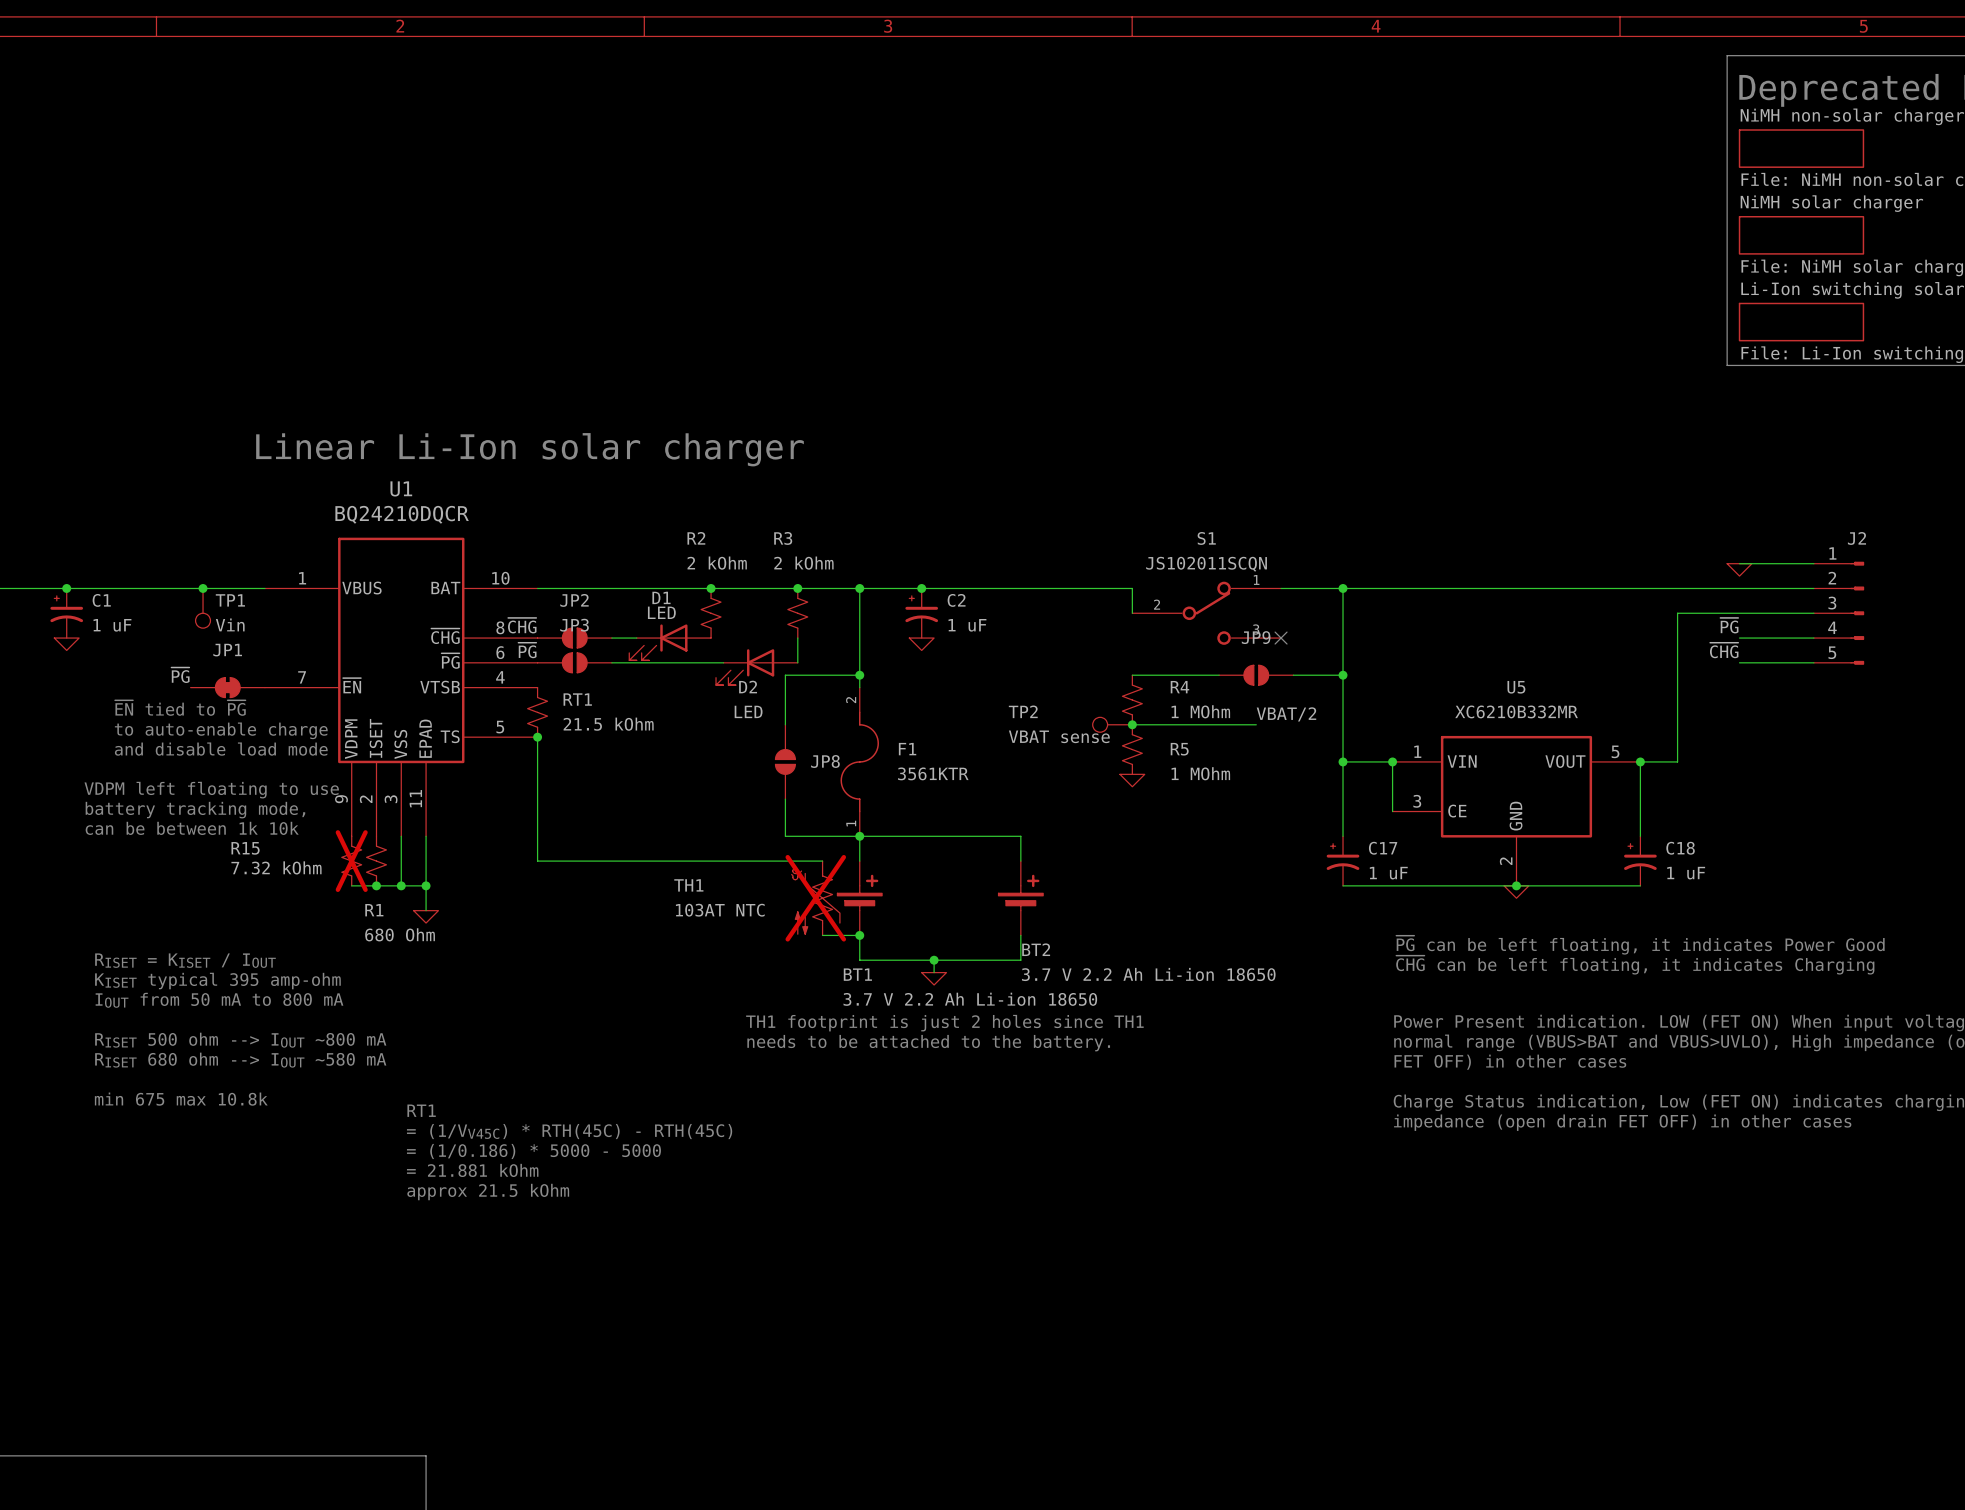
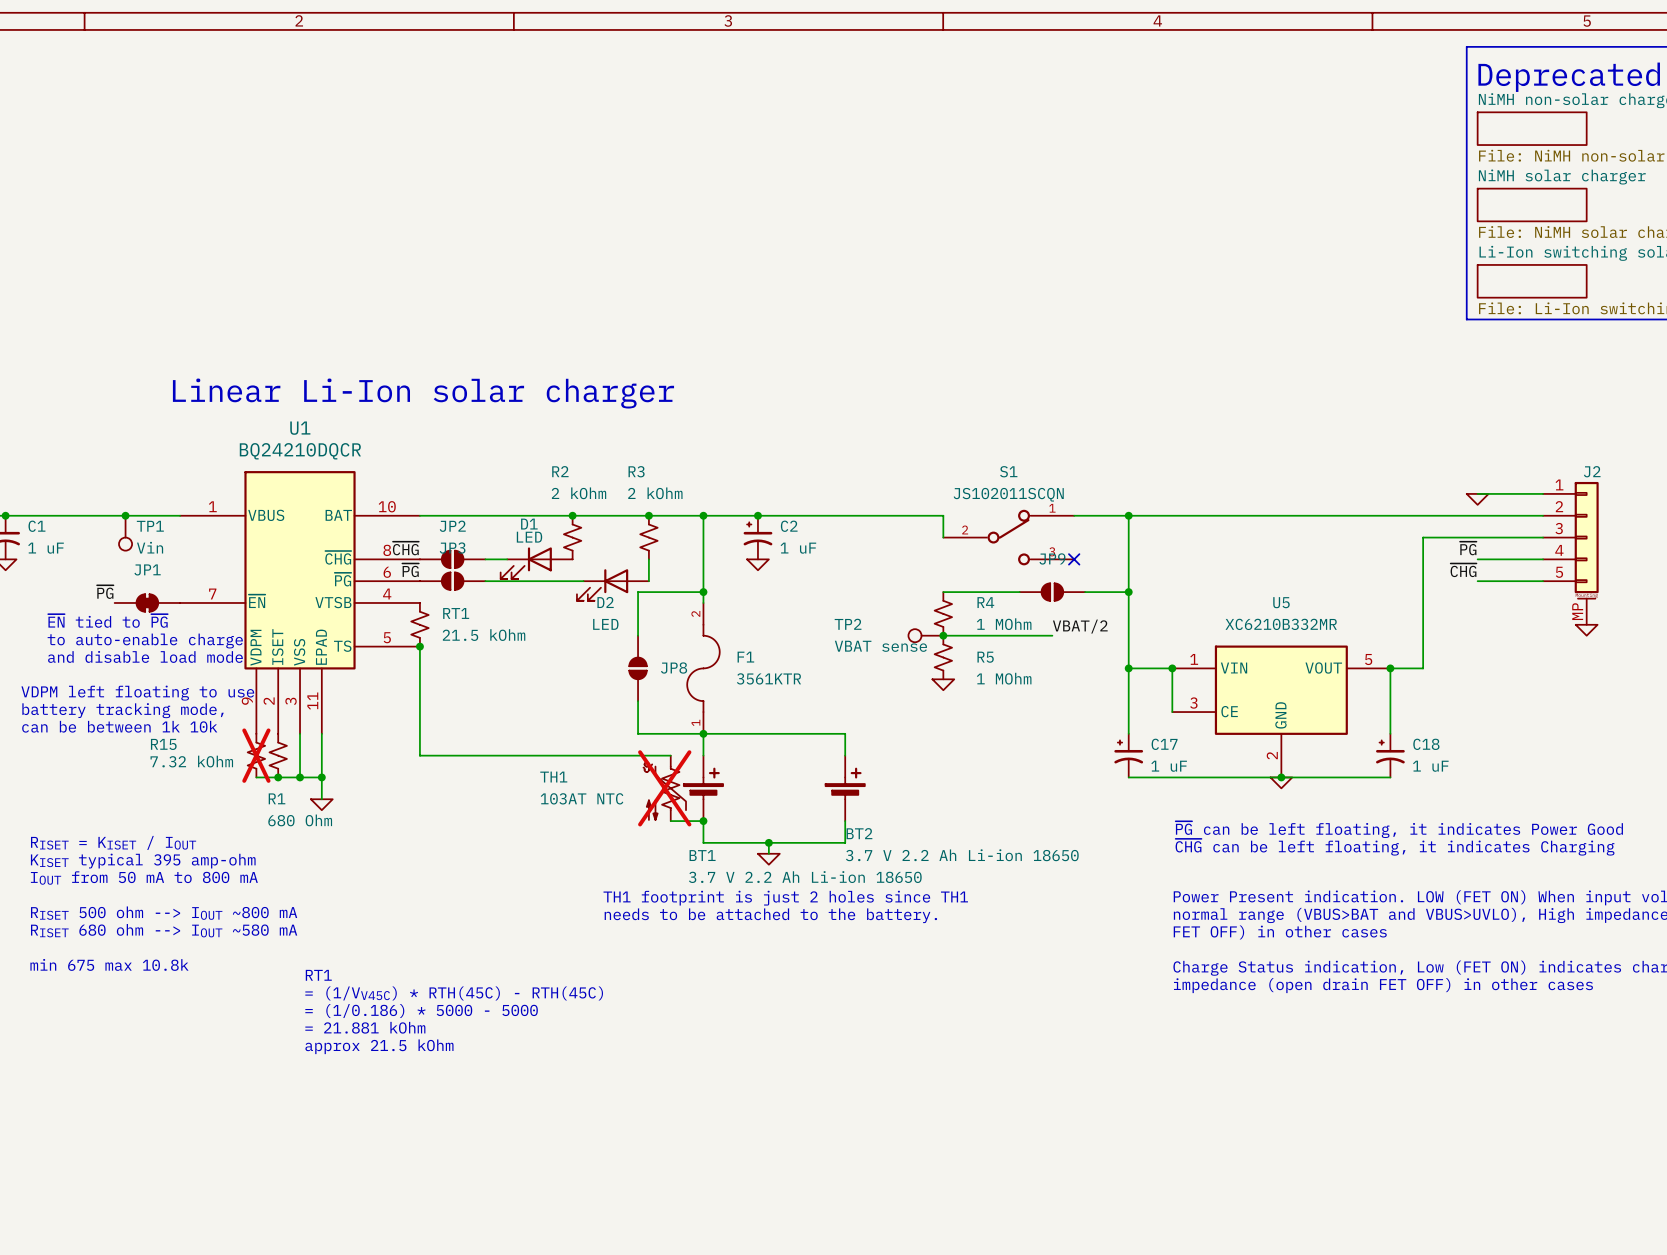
J2 symbol: [1813, 561, 1865, 665] -> [1543, 481, 1599, 625]
power symbol: none -> (1586, 630)

